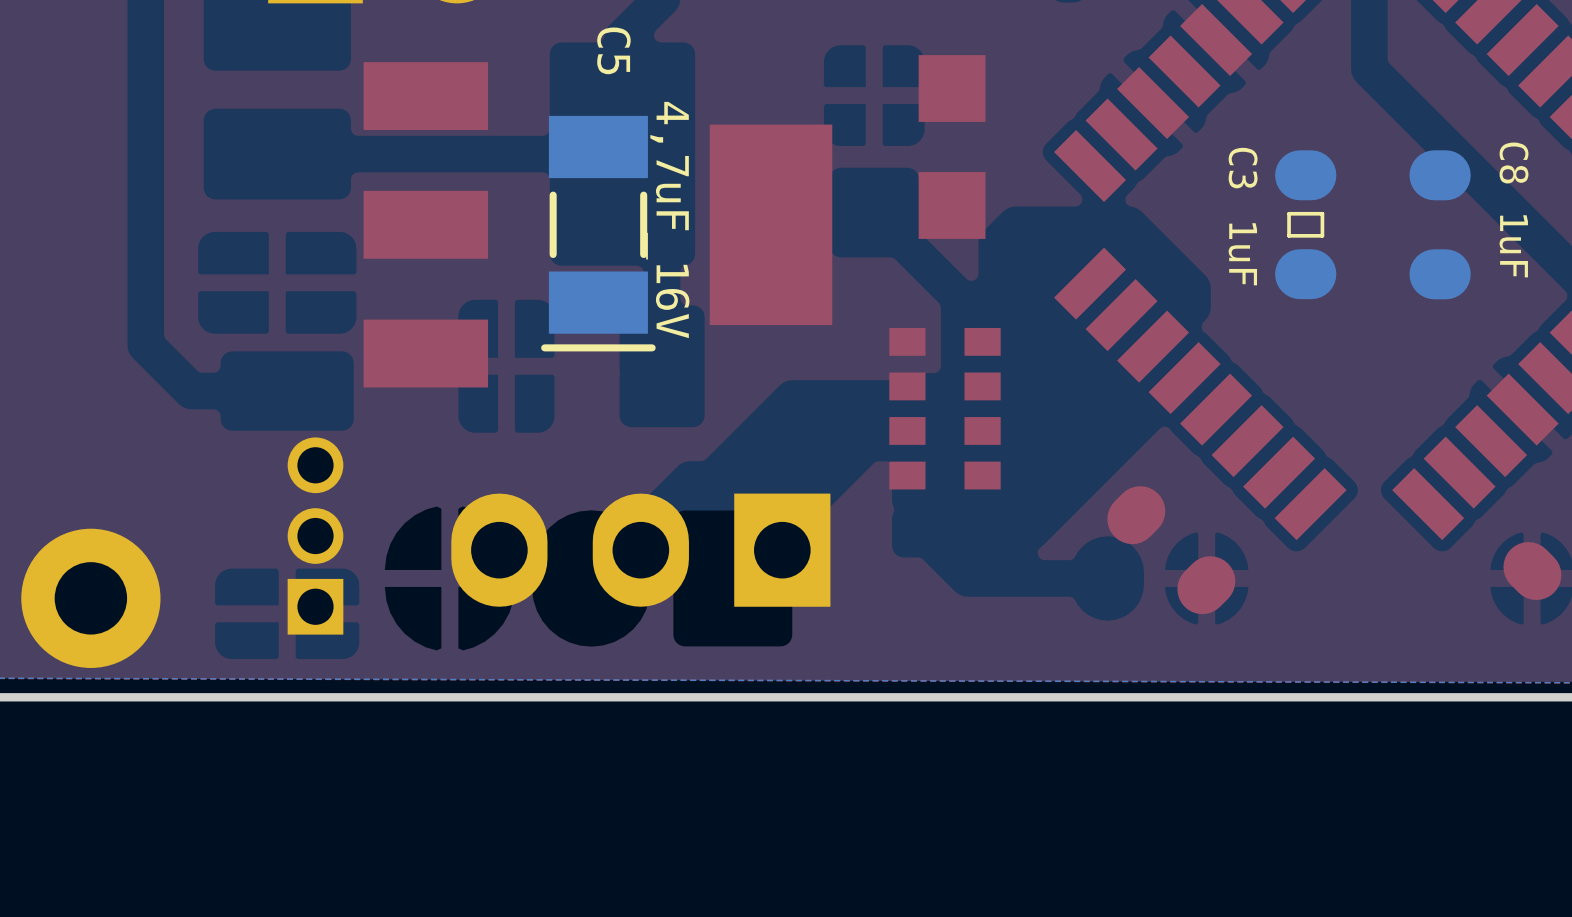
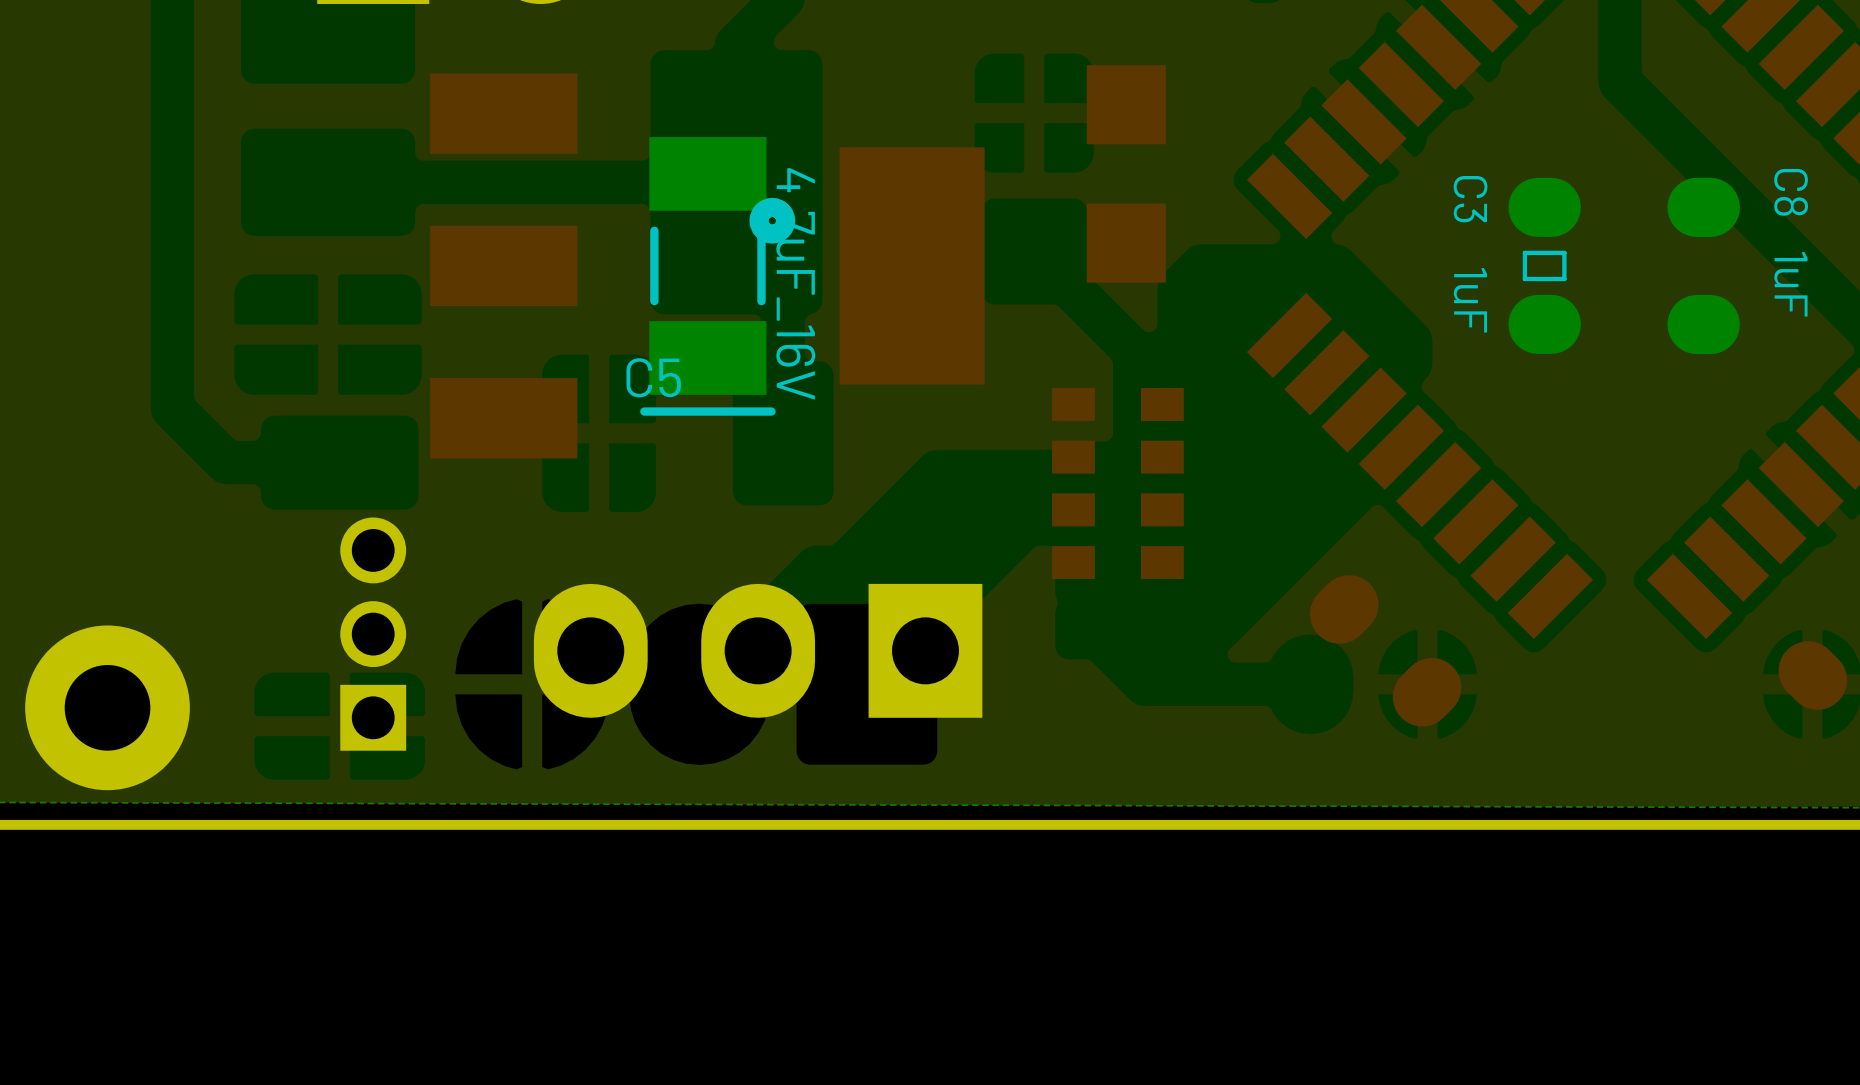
C5 name rotation: 0° (613, 50) -> 90° counterclockwise (653, 377)
C5 name position: C5 (613, 50) -> C5 (653, 377)
drawing: none -> [749, 197, 796, 244]

